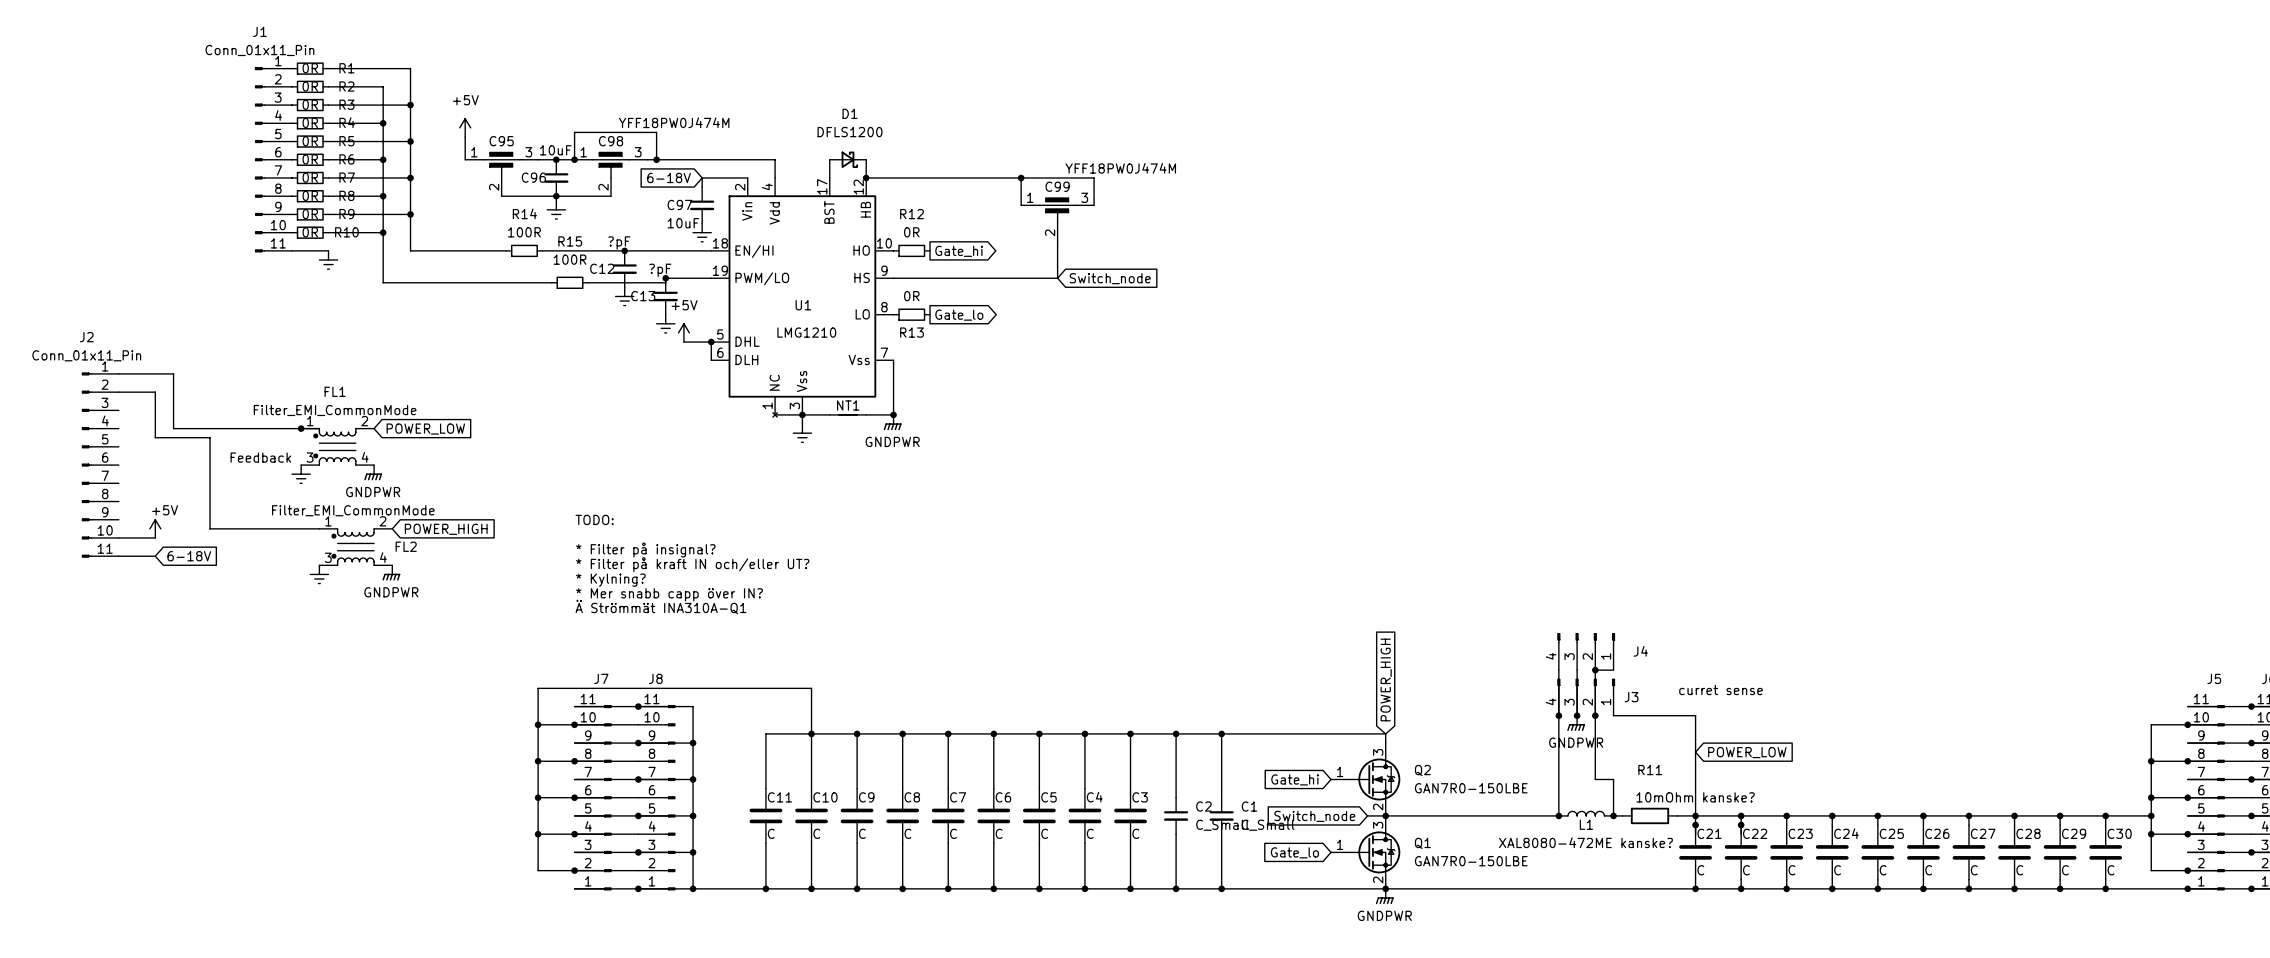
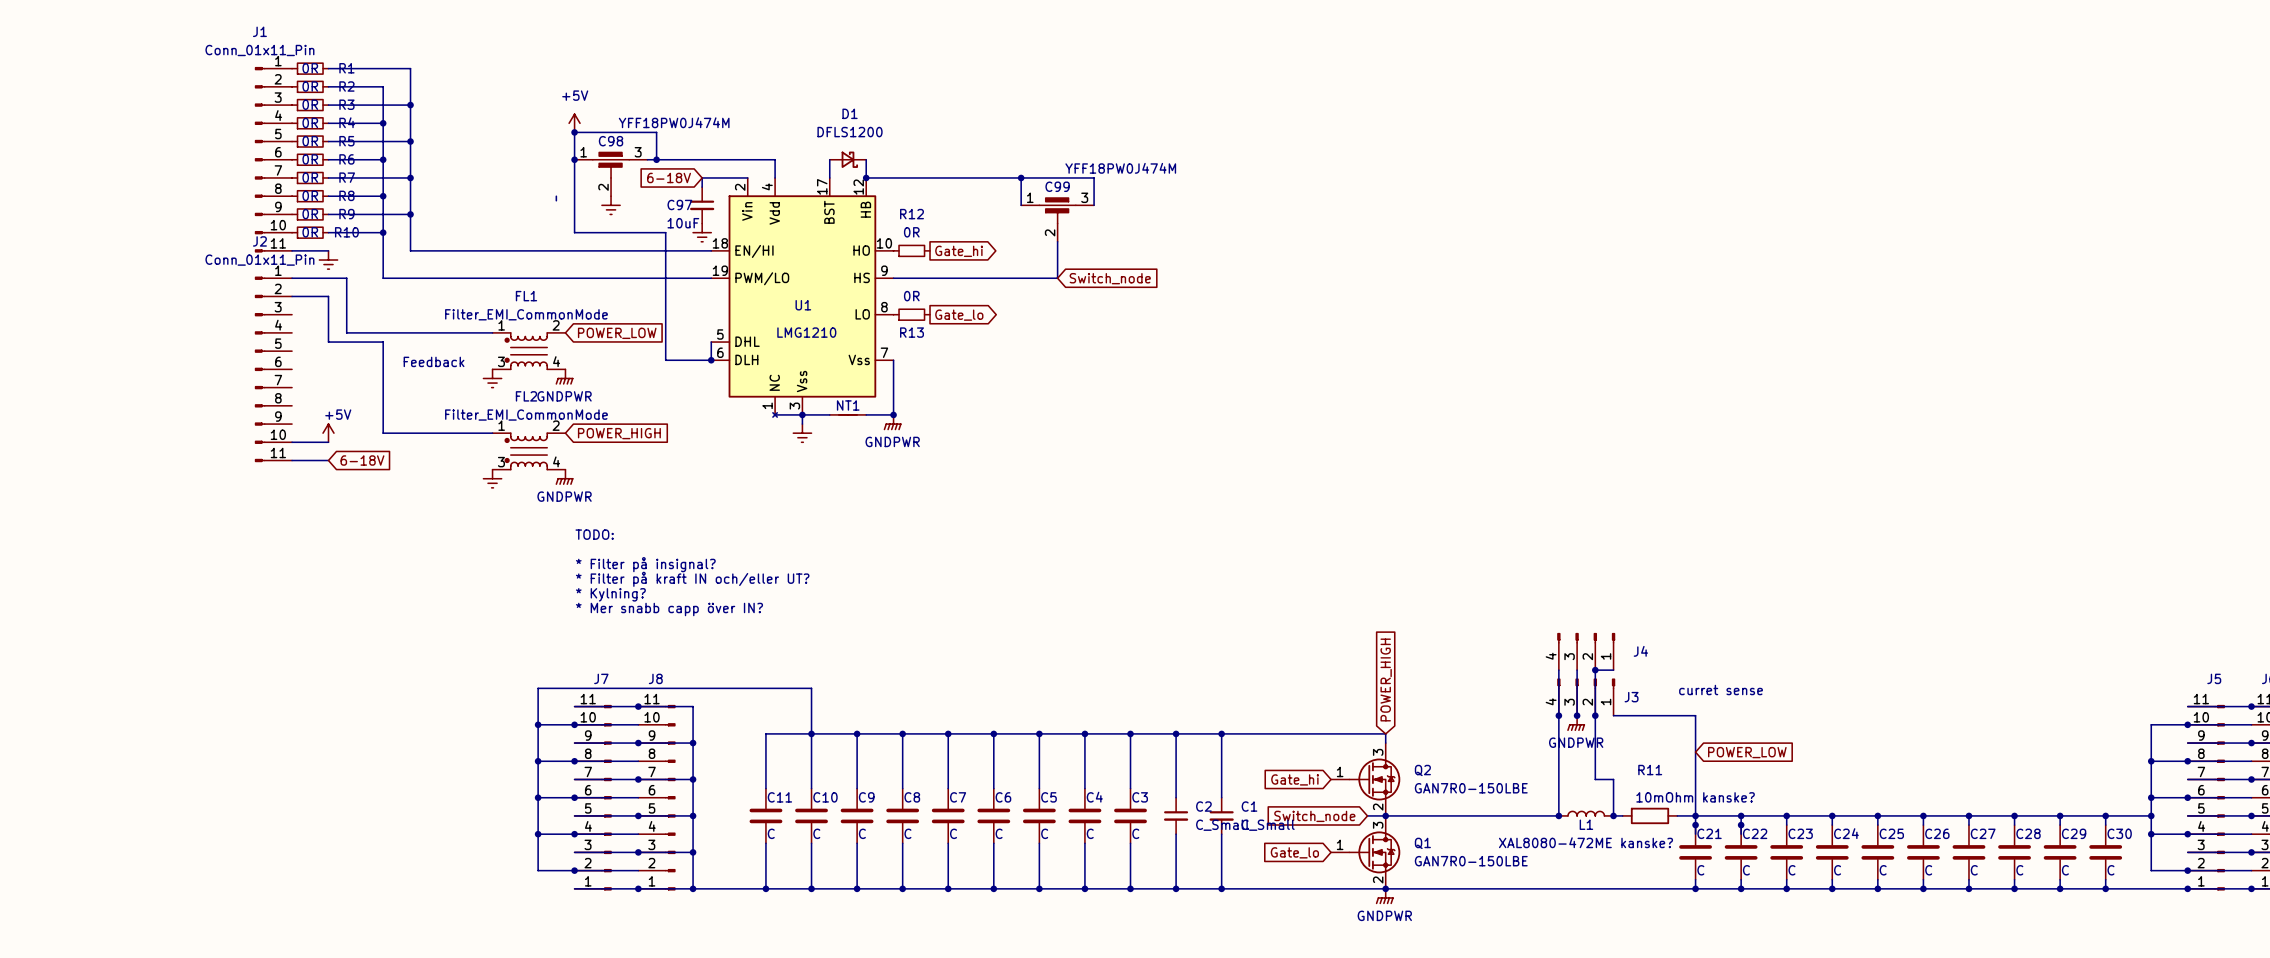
power symbol position: +5V (465, 127) -> +5V (574, 123)
wire: (465, 136) (465, 159) -> none
wire: (538, 159) (574, 159) -> (506, 250) (542, 250)
junction position: (556, 159) -> (574, 132)
C95: (501, 174) -> none
C96: 10uF (556, 177) -> none
wire: (501, 196) (611, 196) -> none
junction: (556, 196) -> none
power symbol: none -> (611, 205)
power symbol: (556, 209) -> none
R14: 100R (524, 250) -> none
junction: (624, 250) -> none
C12: ?pF (624, 269) -> none
wire: none -> (292, 278) (346, 278) (346, 332) (492, 332)
wire: (383, 278) (383, 282) (551, 282) -> (383, 278) (665, 278) (665, 232) (574, 232) (574, 159)
junction: (665, 278) -> none
R15: 100R (570, 282) -> none
wire: (588, 282) (665, 282) -> (711, 360) (665, 360) (665, 282)
wire: none -> (292, 296) (328, 296) (328, 342) (383, 342) (383, 433) (492, 433)
power symbol: (624, 296) -> none
C13: ?pF (665, 296) -> none
power symbol: (665, 323) -> none
power symbol: +5V (683, 332) -> none
global label: none -> POWER_LOW (617, 333)
wire: (683, 342) (711, 342) -> none
junction position: (711, 342) -> (711, 360)
text: none -> Feedback (434, 361)
wire: (118, 373) (173, 373) (173, 428) (319, 428) -> none
power symbol: none -> GNDPWR (564, 377)
power symbol: none -> (492, 378)
wire: (118, 392) (155, 392) (155, 437) (210, 437) (210, 528) (319, 528) -> none
junction: (301, 428) -> none
global label: POWER_LOW (425, 429) -> none
power symbol: none -> +5V (328, 433)
global label: none -> POWER_HIGH (619, 433)
wire: none -> (292, 442) (328, 442)
FL1 position: (337, 446) -> (529, 351)
text: Feedback (260, 457) -> none
wire: none -> (292, 460) (328, 460)
global label: none -> 6-18V (362, 460)
J2 position: (100, 465) -> (273, 369)
power symbol: GNDPWR (373, 472) -> none
power symbol: (301, 474) -> none
power symbol: none -> GNDPWR (564, 477)
power symbol: none -> (492, 478)
text position: TODO: (594, 519) -> TODO: (594, 534)
power symbol: +5V (155, 528) -> none
global label: POWER_HIGH (446, 529) -> none
wire: (118, 537) (155, 537) -> none
FL2 name position: FL2 (406, 546) -> FL2 (526, 396)
FL2 position: (355, 547) -> (529, 451)
text: * Filter på insignal? (645, 549) -> none
wire: (118, 556) (155, 556) -> none
global label: 6-18V (189, 556) -> none
text: * Filter på kraft IN och/eller UT? (692, 564) -> * Filter på insignal? (645, 564)
power symbol: GNDPWR (391, 572) -> none
power symbol: (319, 574) -> none
text: * Kylning? (610, 580) -> * Filter på kraft IN och/eller UT? (692, 579)
text: * Mer snabb capp över IN? (669, 594) -> * Kylning? (610, 594)
text: Ä Strömmät INA310A-Q1 (661, 606) -> * Mer snabb capp över IN? (669, 609)

